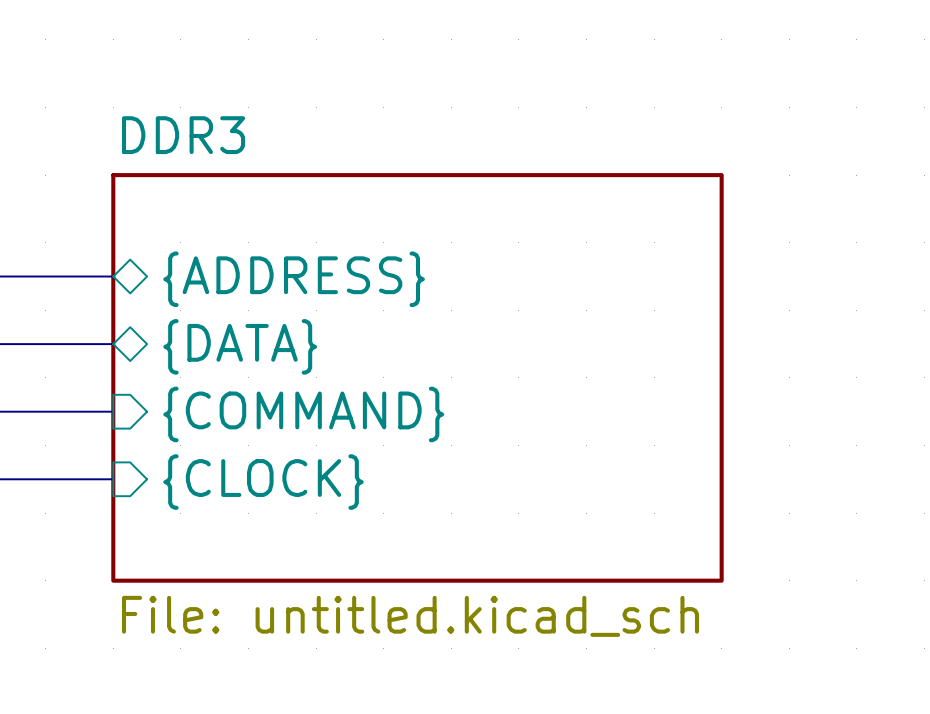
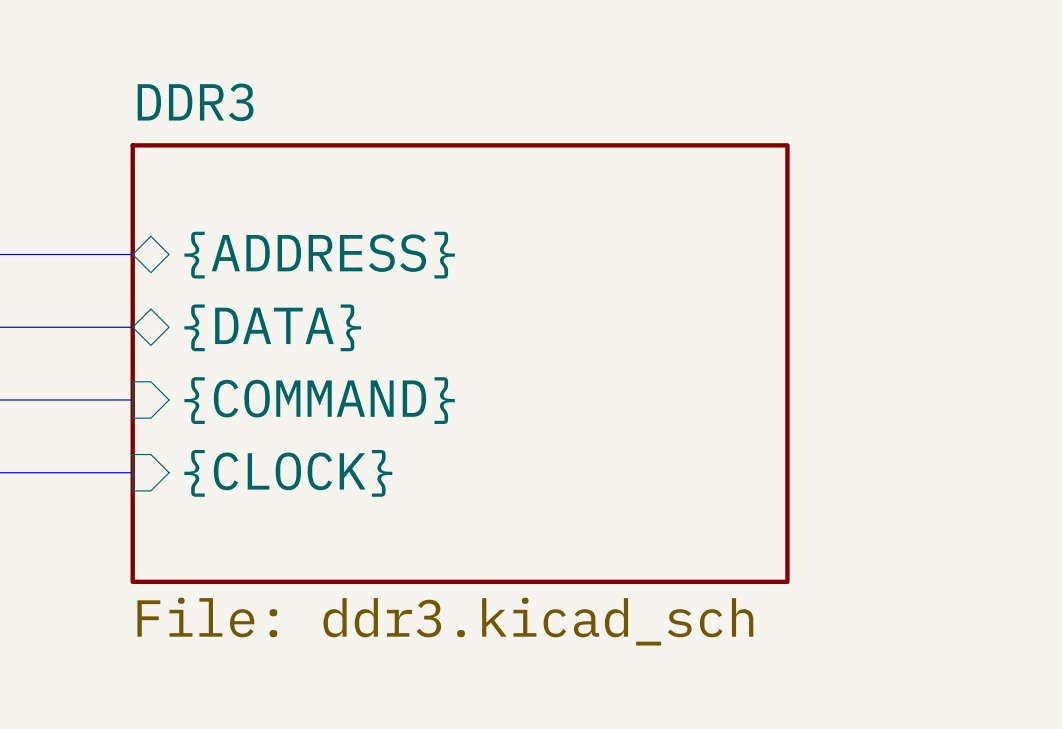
sheet DDR3 value: File: untitled.kicad_sch (410, 616) -> File: ddr3.kicad_sch (445, 621)

